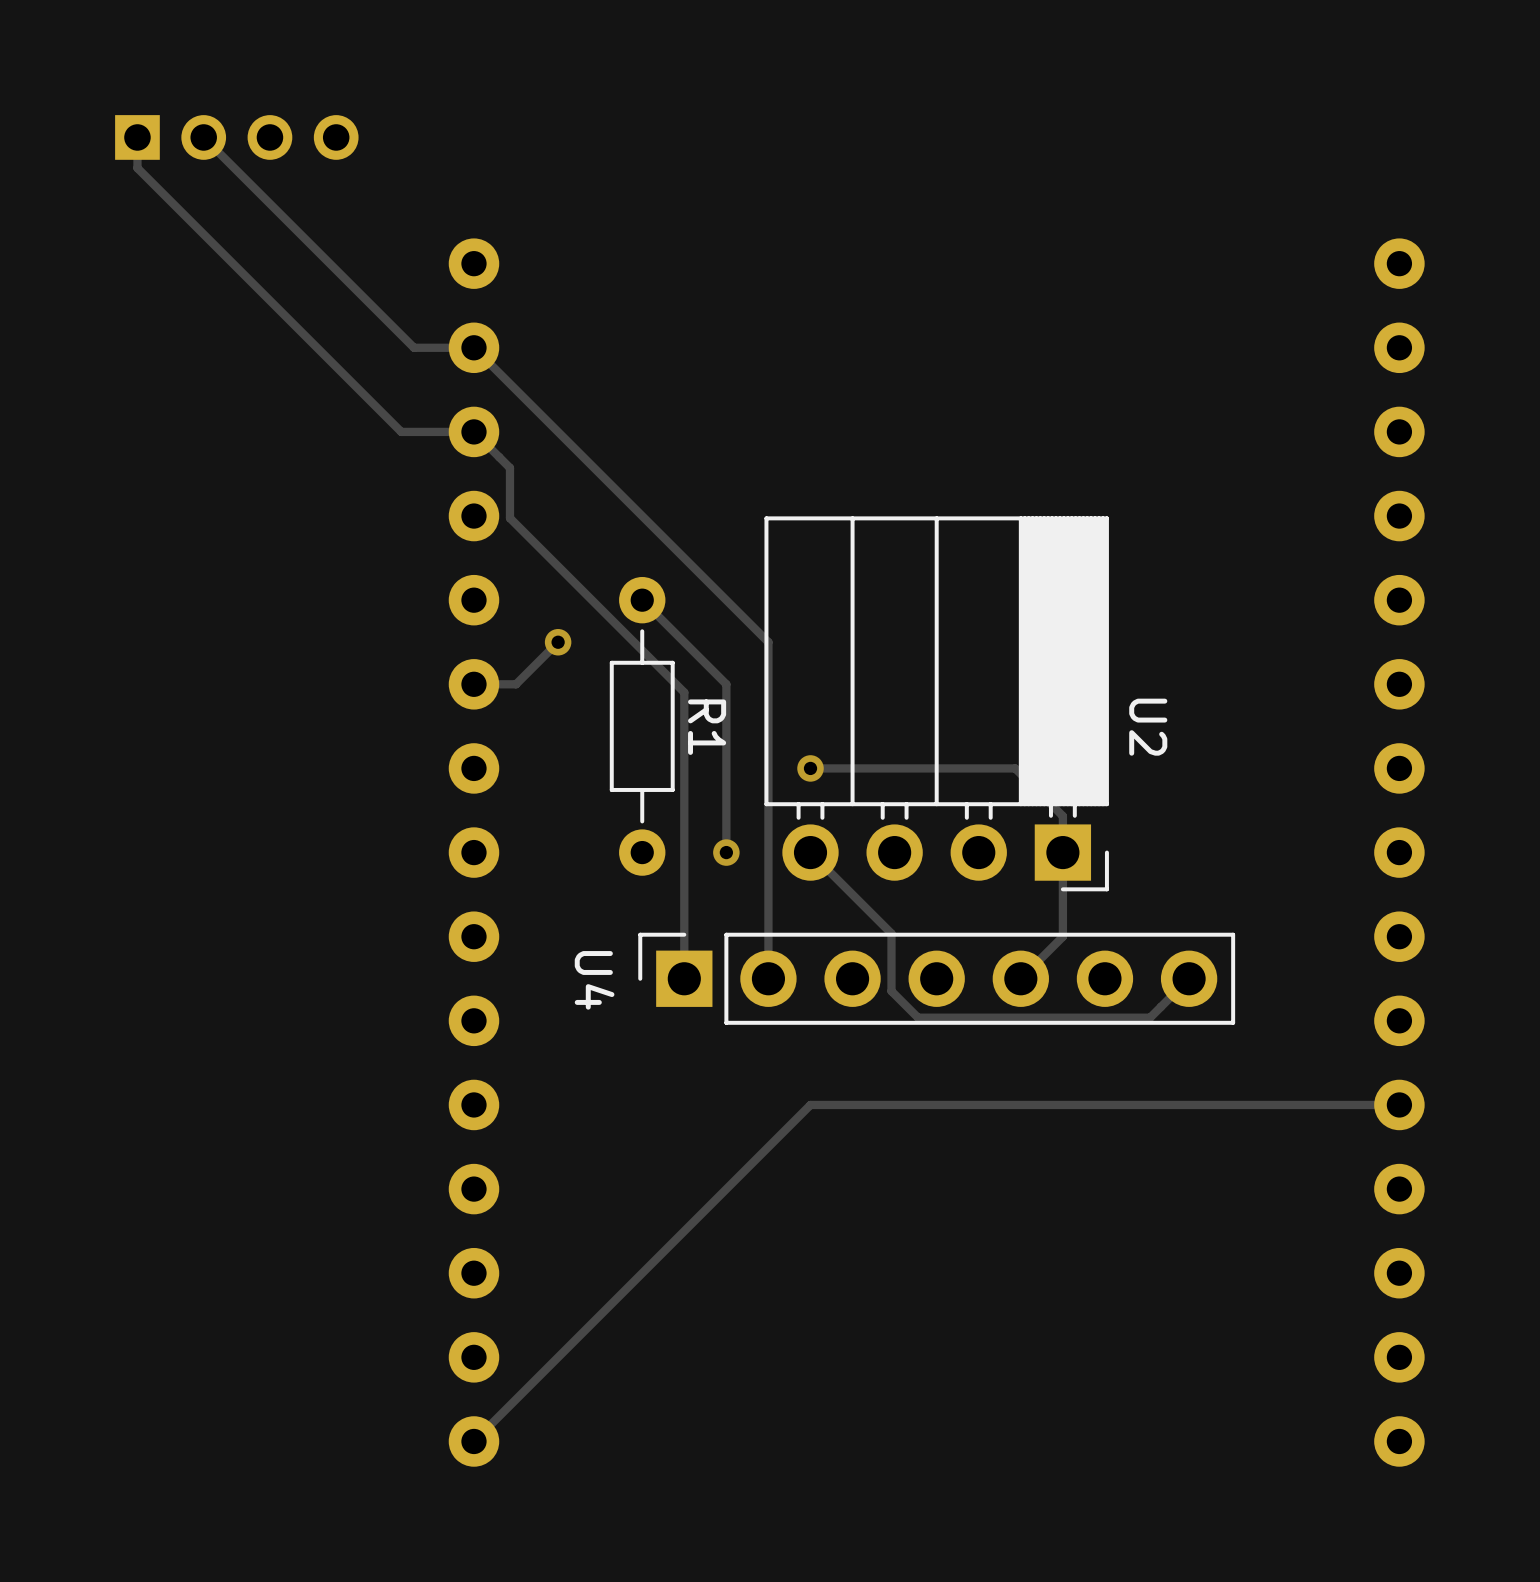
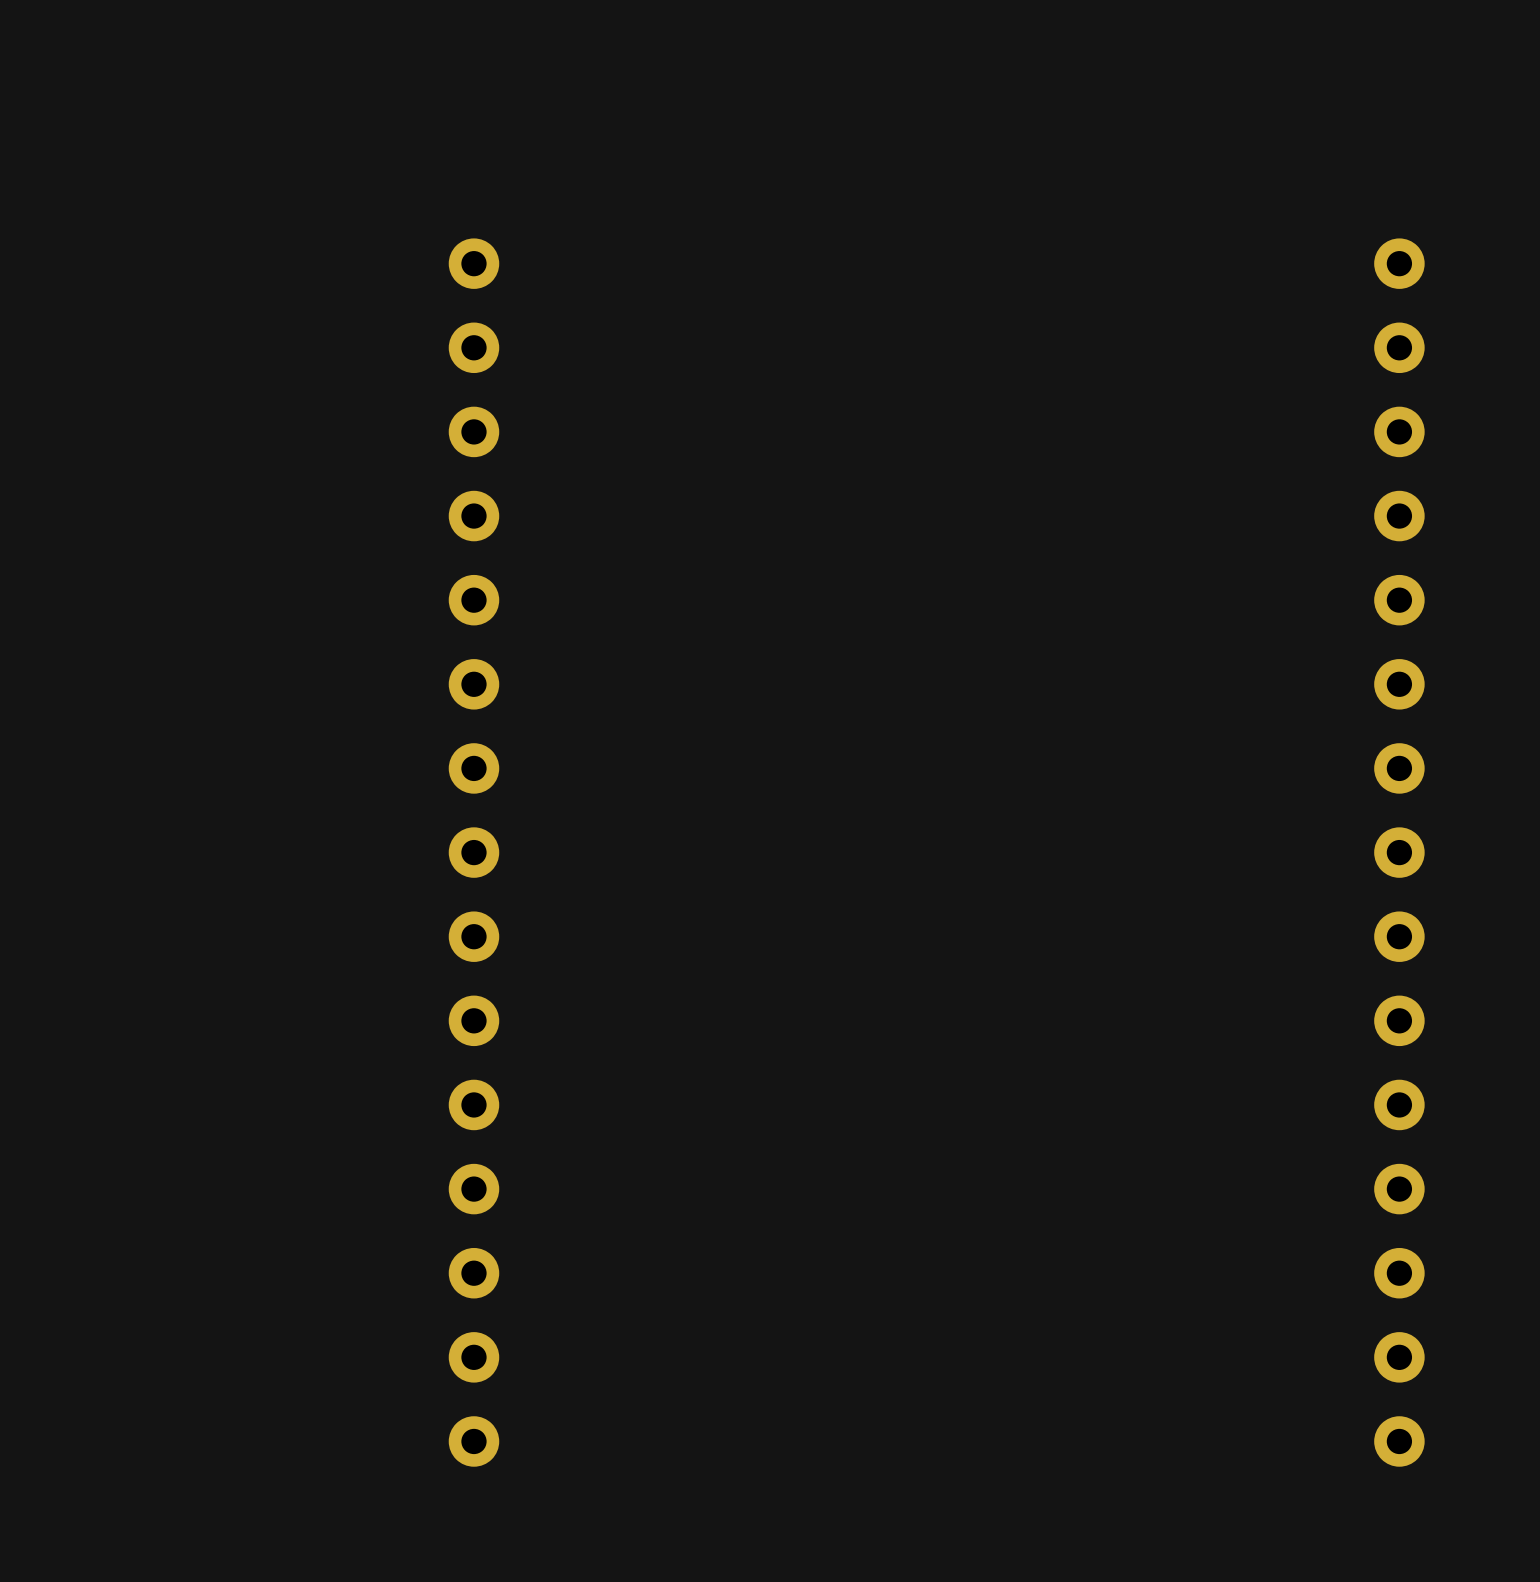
track: (137, 137) (137, 168) (401, 431) (473, 431) (509, 467) (509, 518) (684, 692) (684, 978) -> none
track: (203, 137) (414, 347) (473, 347) (768, 642) (768, 978) -> none
part: (236, 137) -> none
track: (642, 600) (726, 684) (726, 852) -> none
track: (558, 642) (516, 684) (473, 684) -> none
via: (558, 642) -> none
U2: (936, 703) -> none
R1: (642, 726) -> none
track: (810, 768) (1015, 768) (1062, 816) (1062, 936) (1020, 978) -> none
via: (810, 768) -> none
via: (726, 852) -> none
track: (810, 852) (891, 933) (891, 991) (918, 1017) (1150, 1017) (1189, 978) -> none
U4: (936, 978) -> none
track: (1399, 1104) (810, 1104) (473, 1441) -> none

